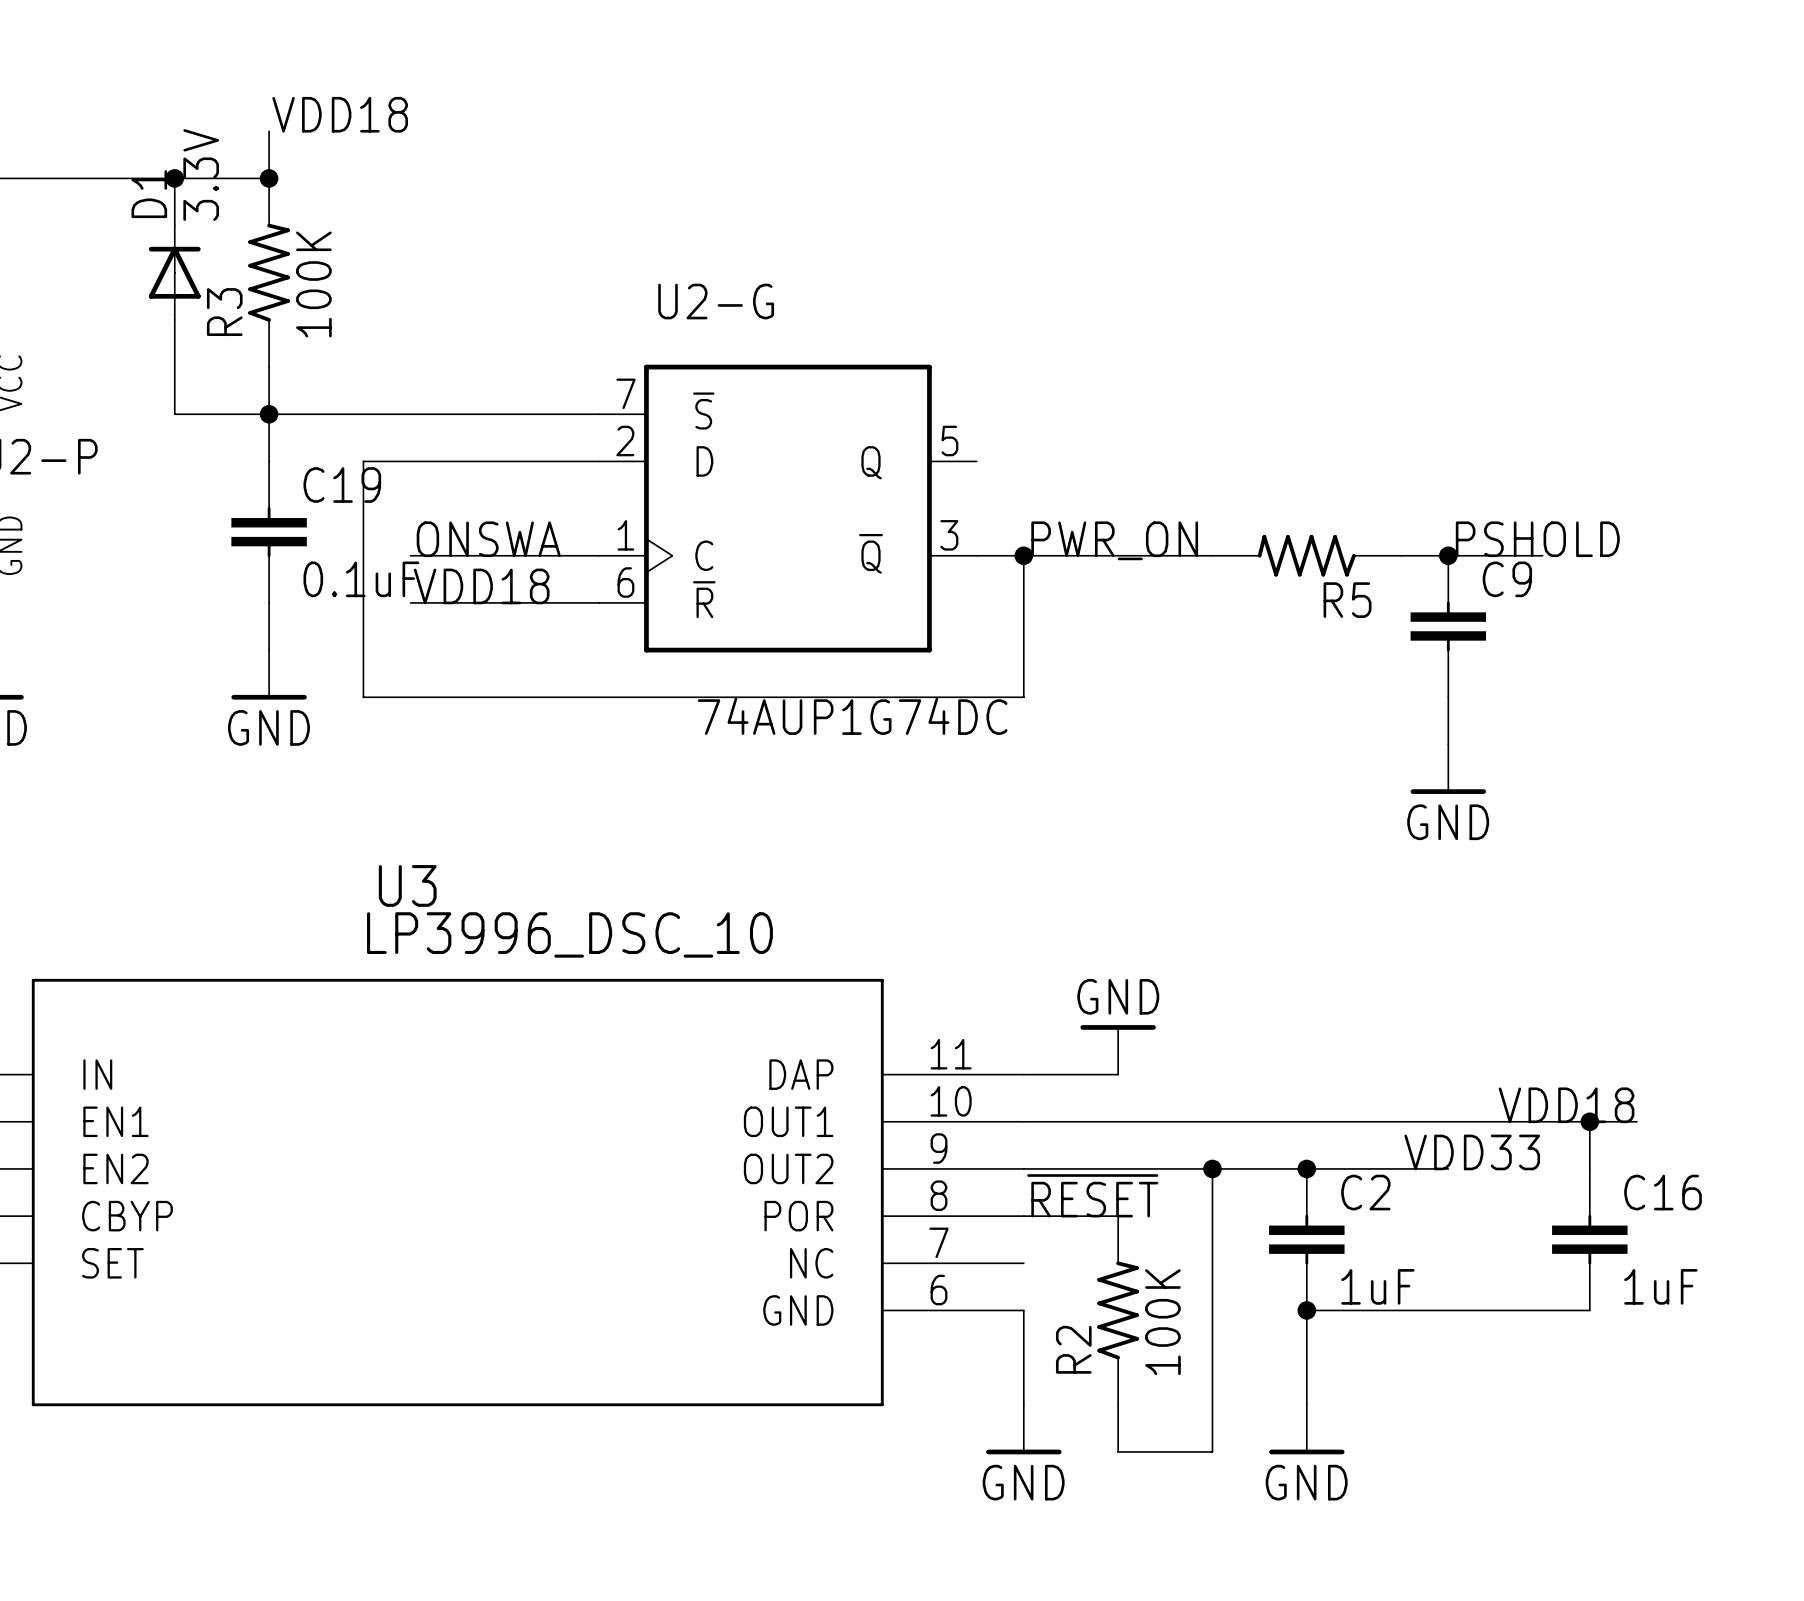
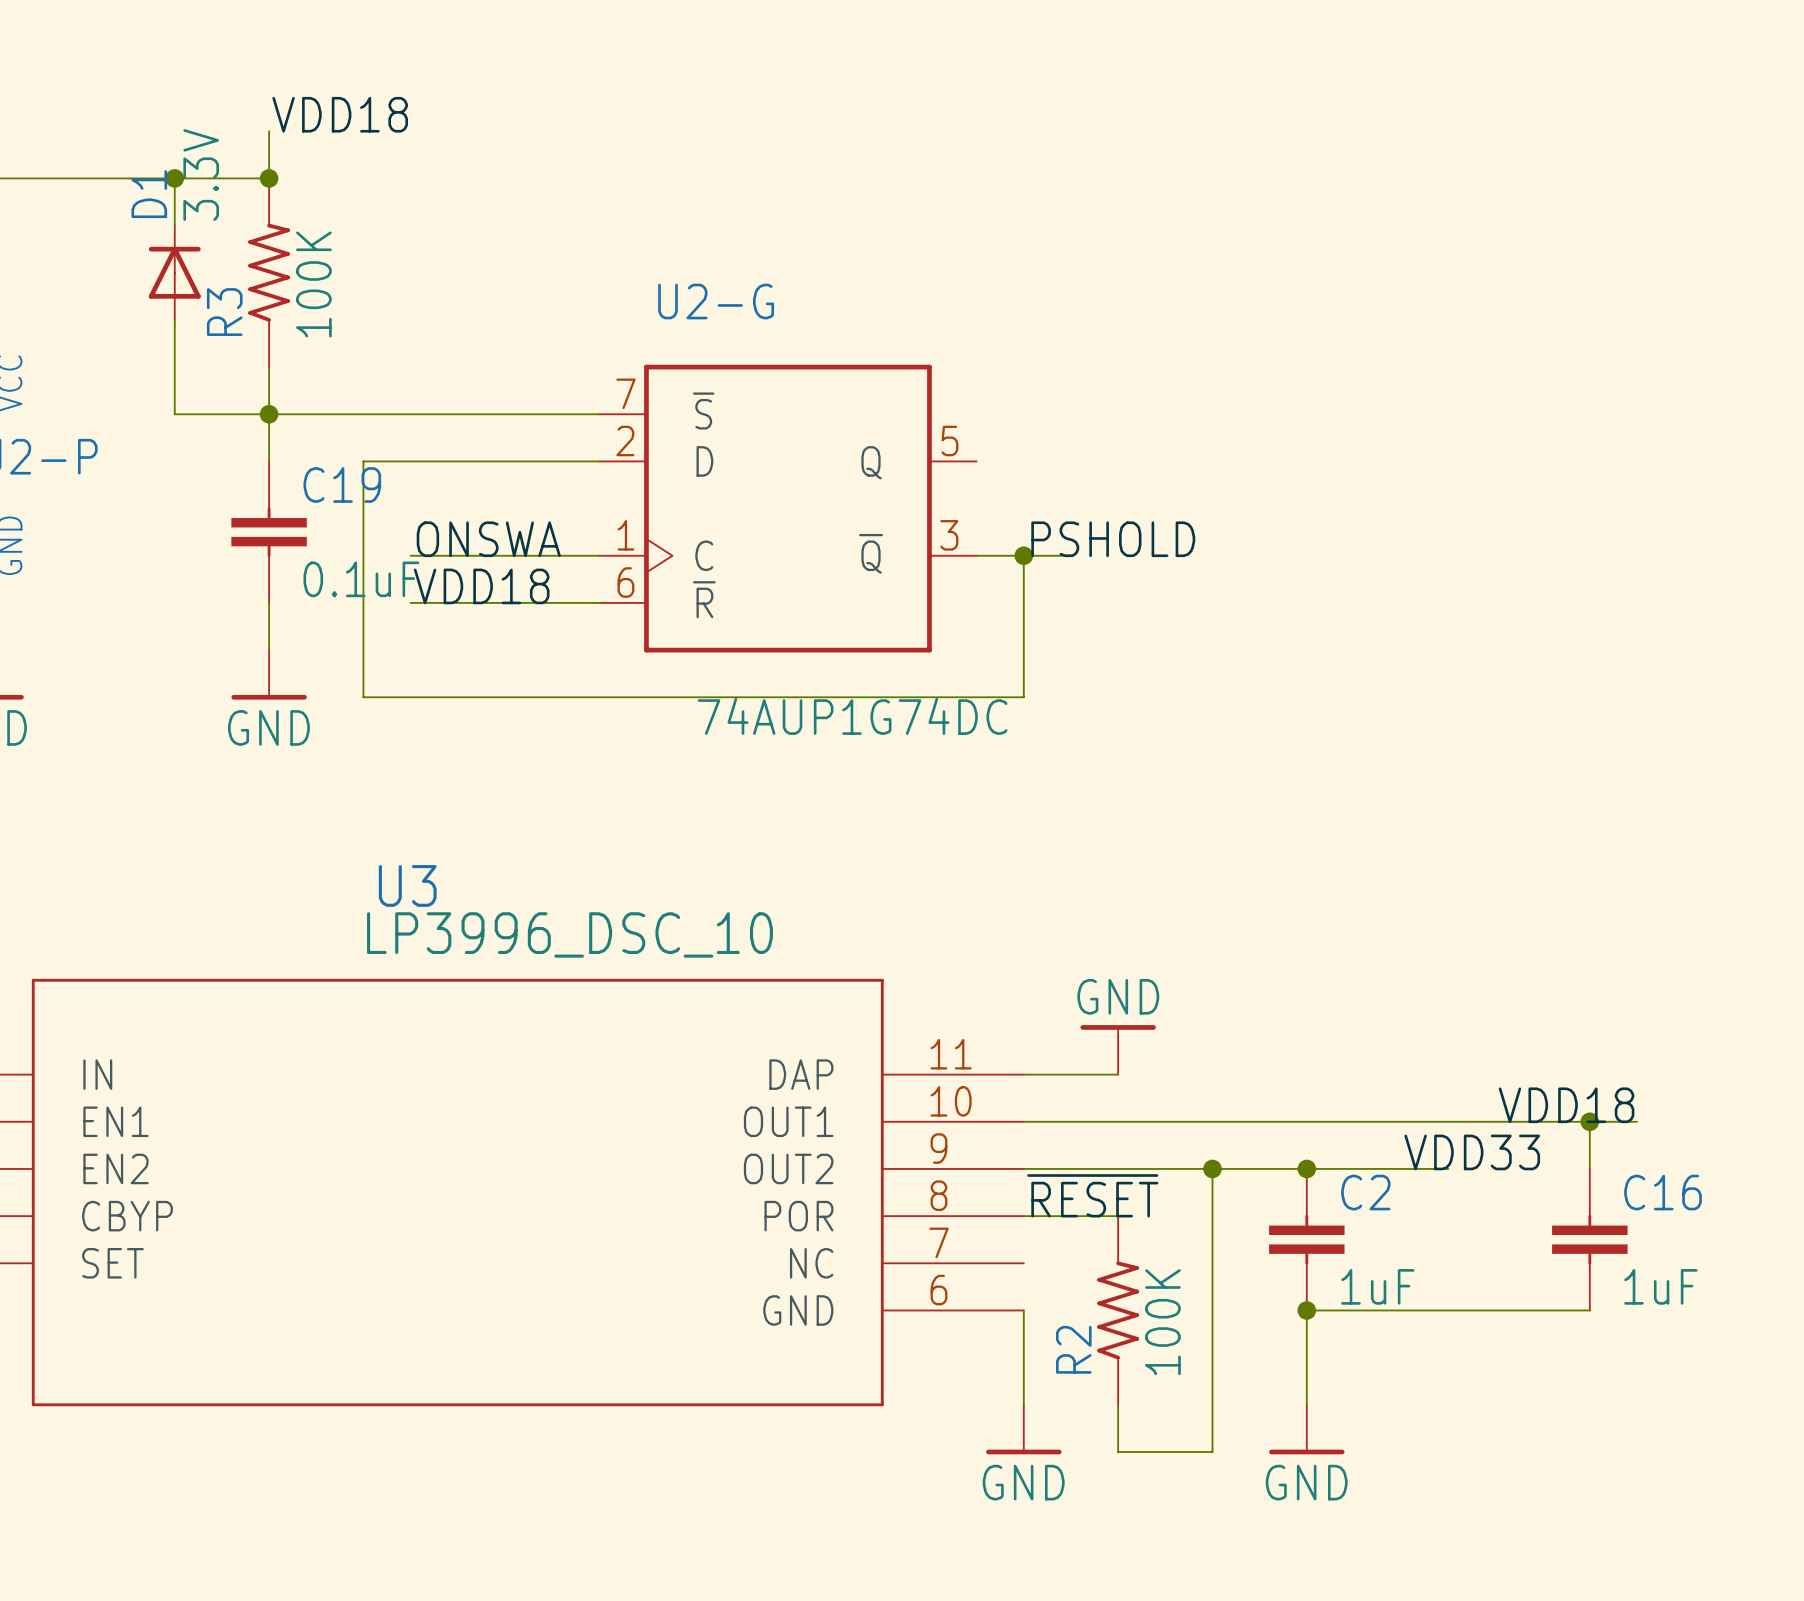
label: PSHOLD (1537, 539) -> none
label: PWR_ON (1114, 540) -> PSHOLD (1113, 539)
wire: (1070, 555) (1212, 555) -> none
R5: (1306, 555) -> none
wire: (1401, 555) (1542, 555) -> none
junction: (1448, 555) -> none
C9: (1448, 626) -> none
wire: (1448, 697) (1448, 744) -> none
power symbol: GND (1448, 769) -> none

